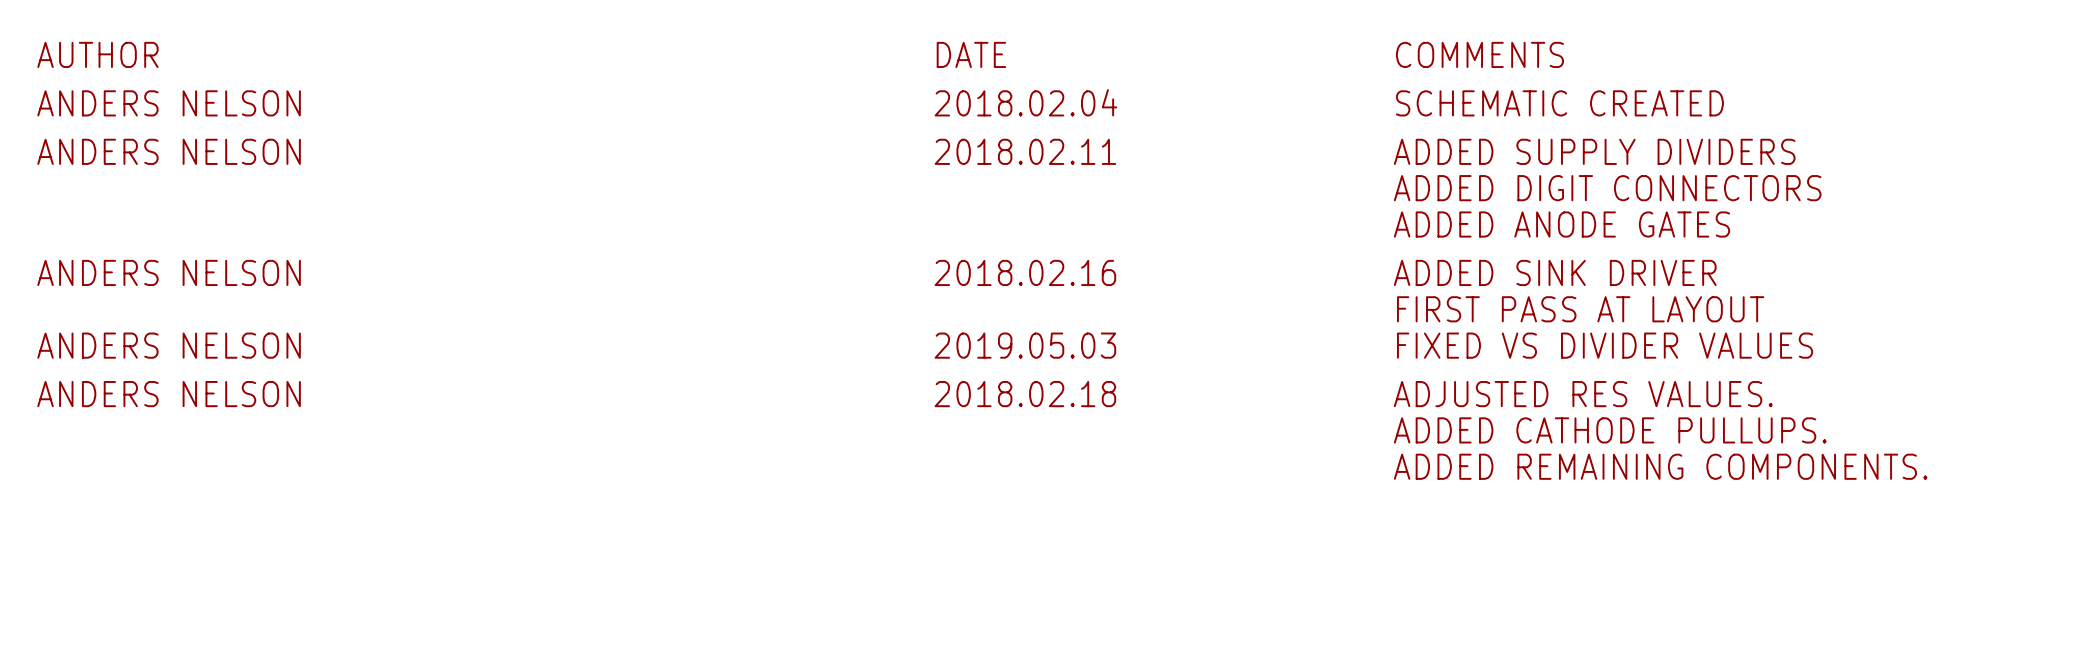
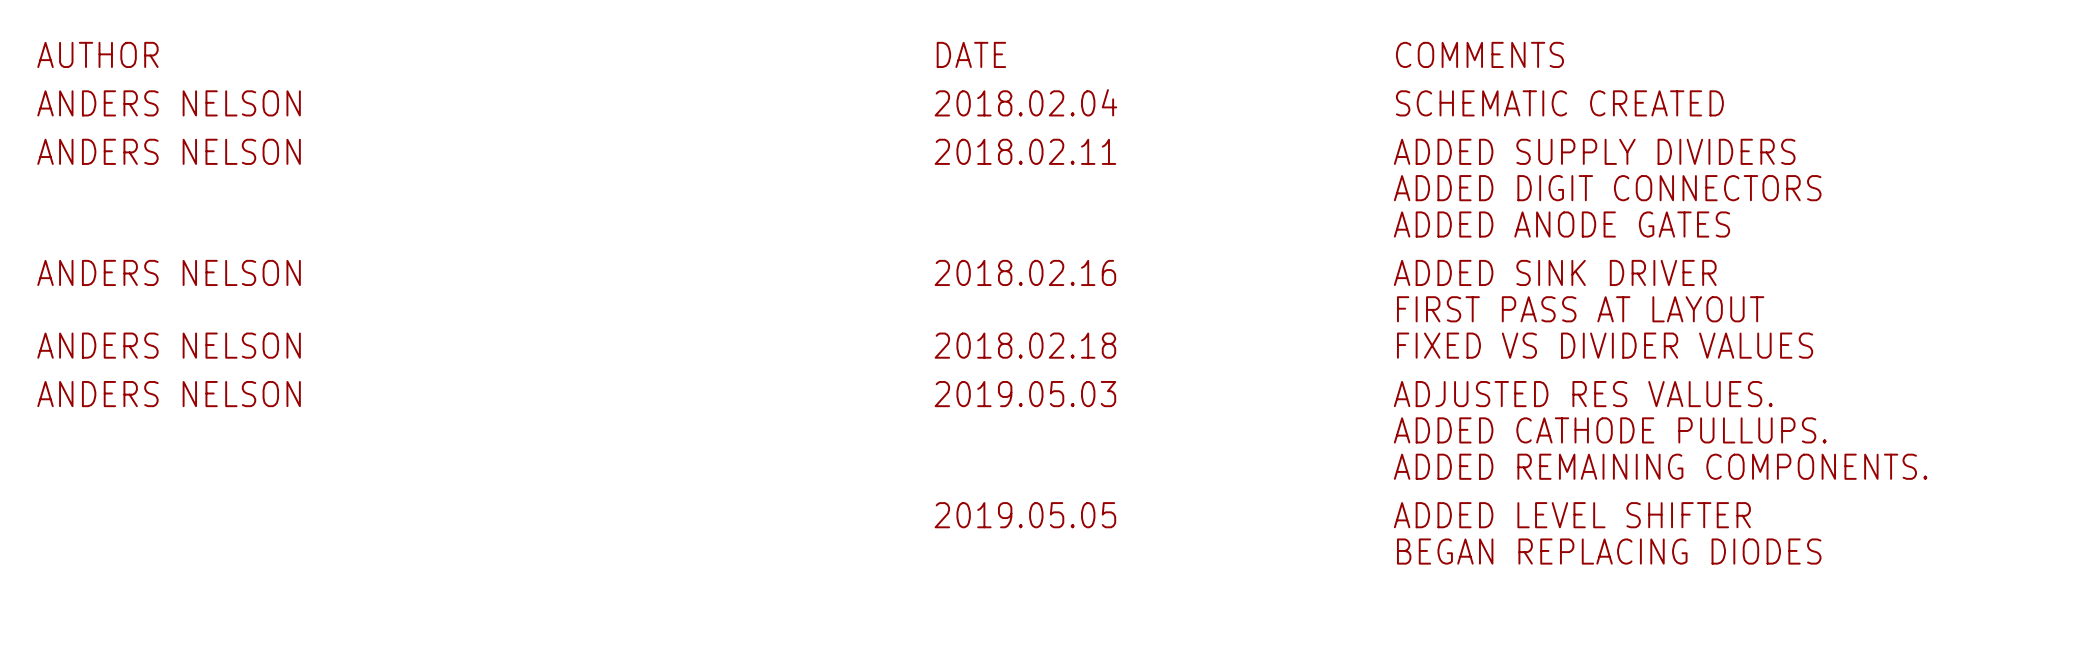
text: 2019.05.03 (1025, 345) -> 2018.02.18 (1025, 345)
text: 2018.02.18 (1025, 394) -> 2019.05.03 (1025, 394)
text: none -> 2019.05.05 (1025, 515)
text: none -> ADDED LEVEL SHIFTER (1572, 515)
text: none -> BEGAN REPLACING DIODES (1609, 551)

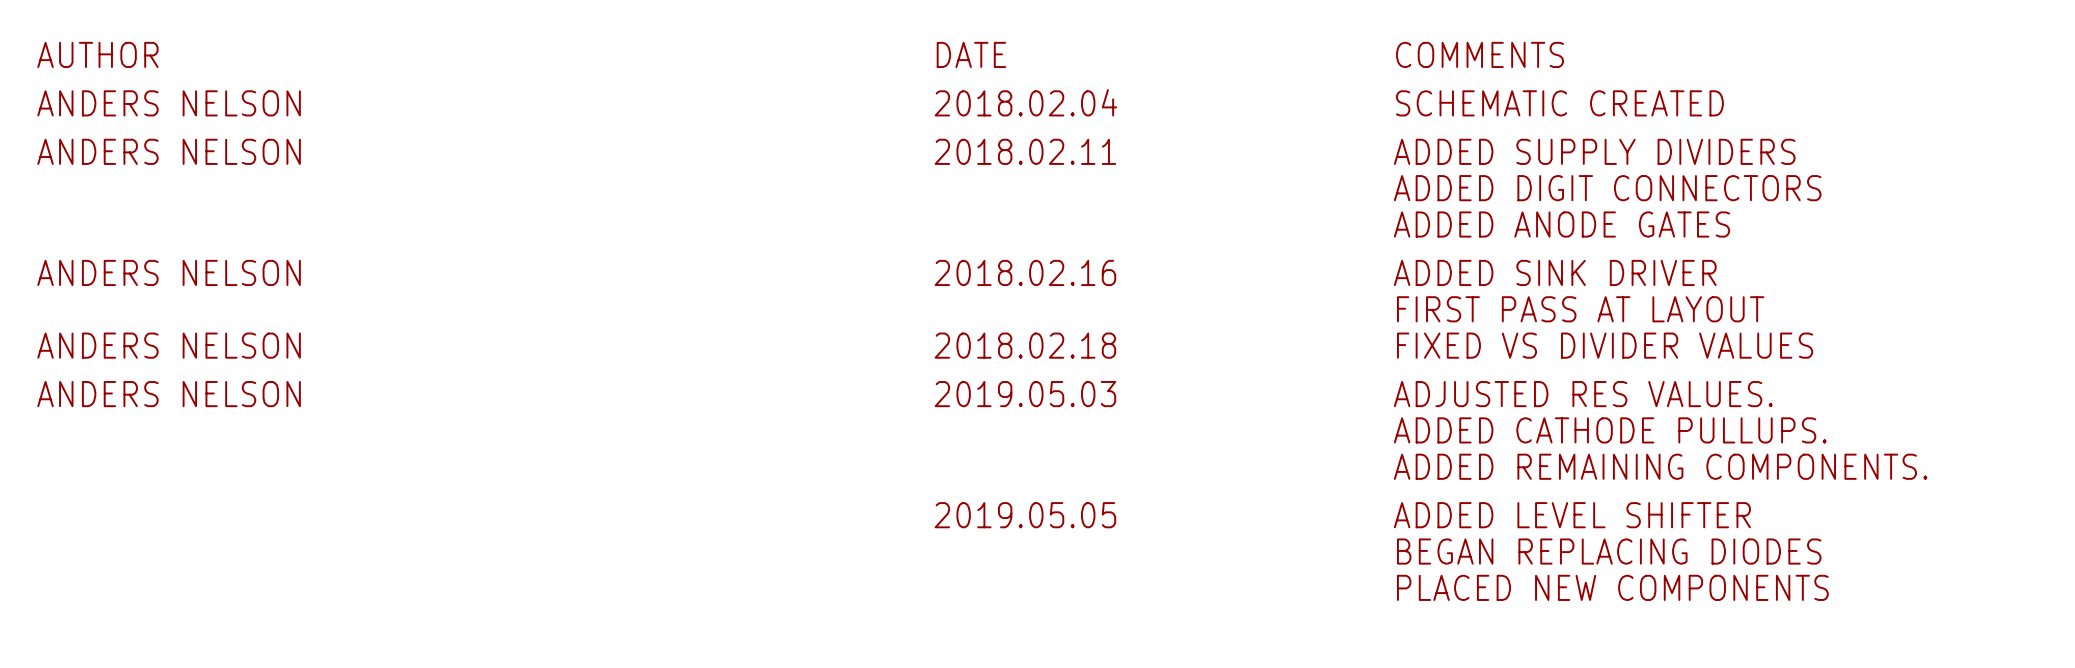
text: none -> PLACED NEW COMPONENTS (1612, 587)

